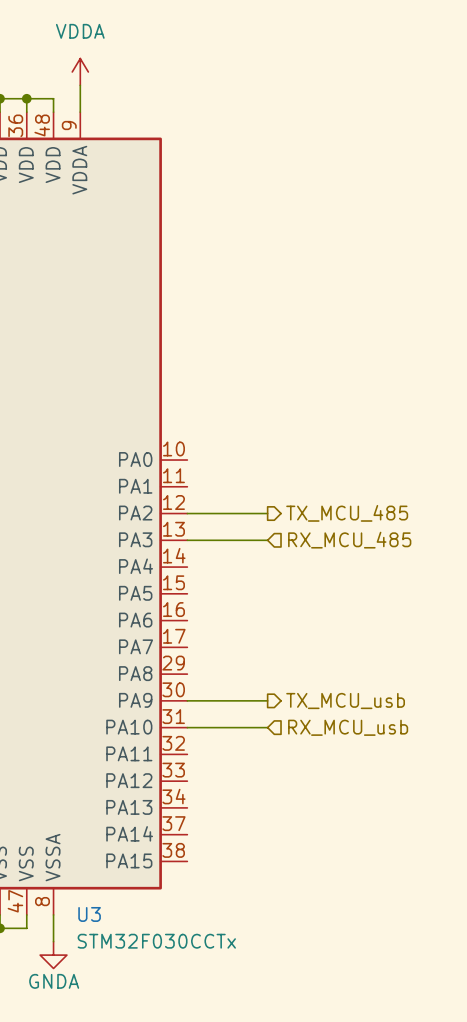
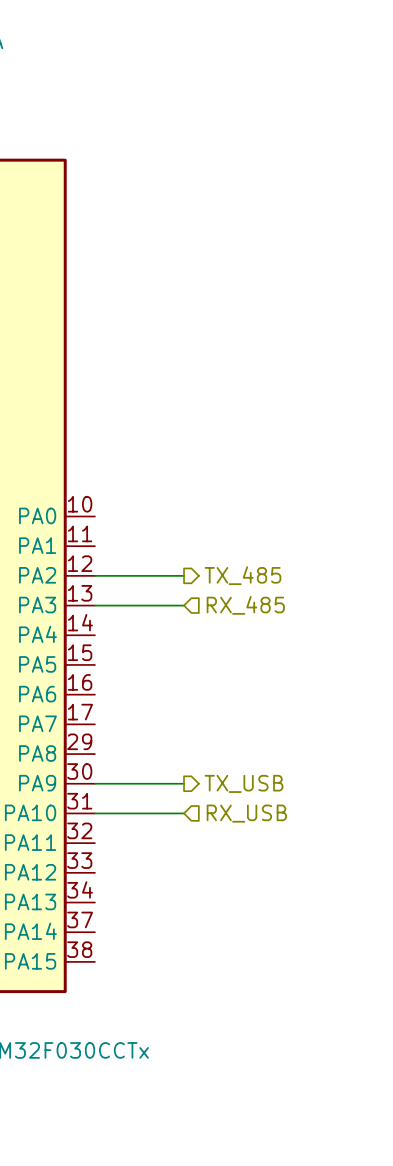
hierarchical label: TX_MCU_485 (347, 513) -> TX_485 (242, 575)
hierarchical label: RX_MCU_485 (349, 540) -> RX_485 (245, 605)
hierarchical label: TX_MCU_usb (345, 701) -> TX_USB (243, 783)
hierarchical label: RX_MCU_usb (348, 727) -> RX_USB (246, 813)

